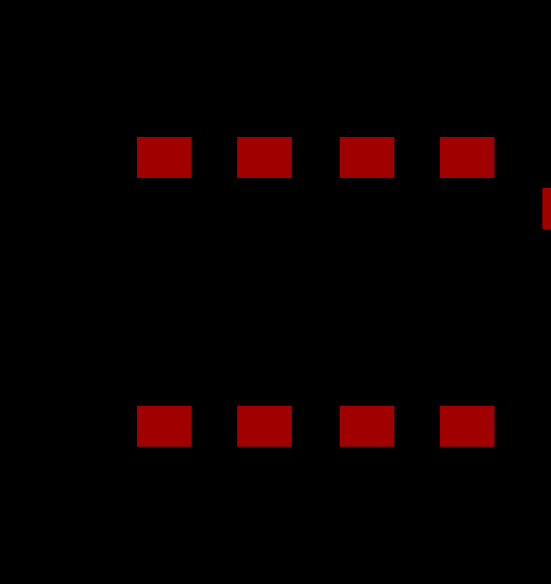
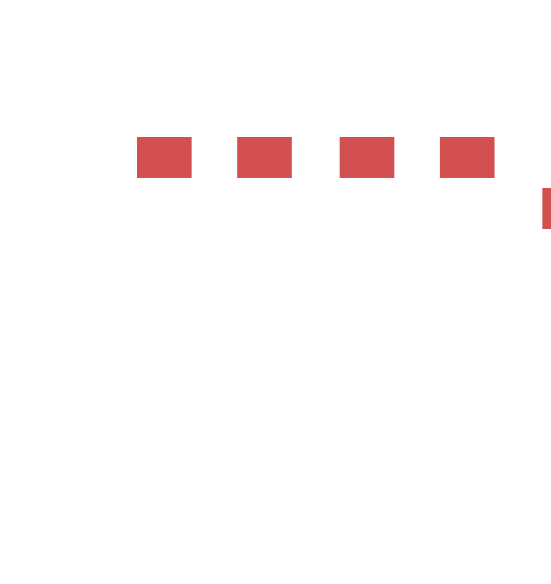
part: (214, 426) -> none
part: (417, 426) -> none

